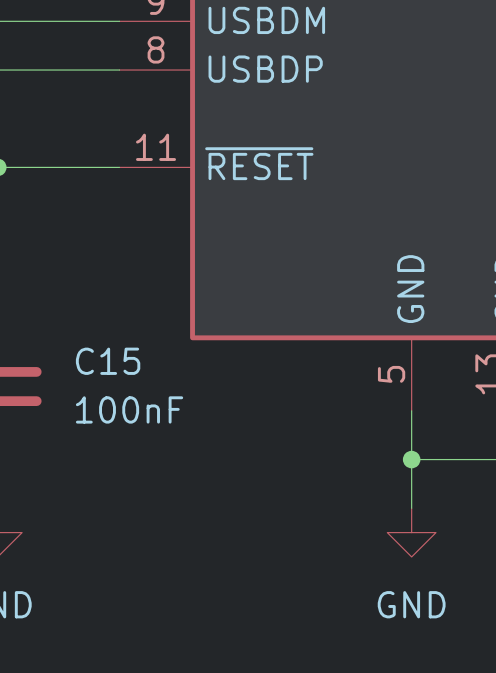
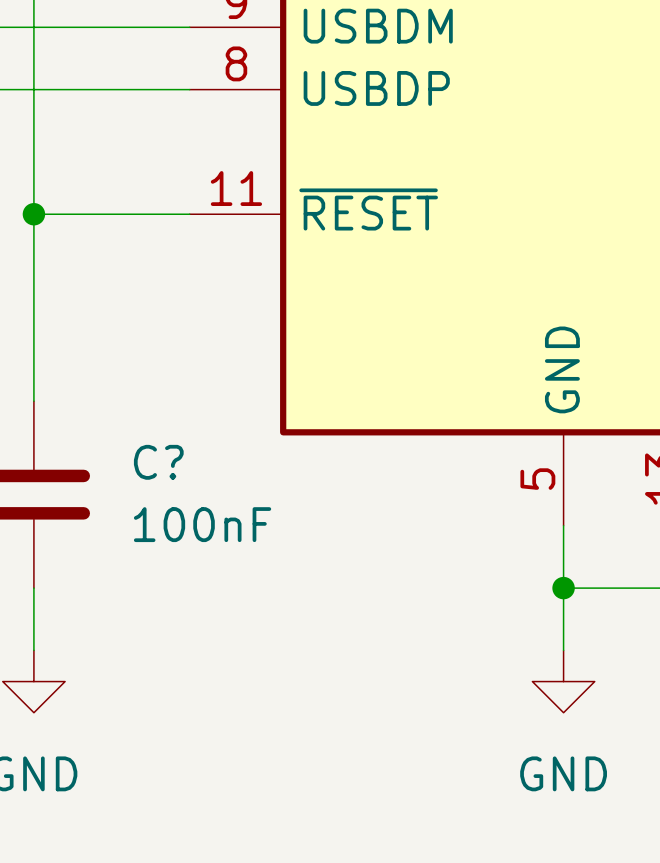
C15 name: C15 (108, 361) -> C? (158, 462)

